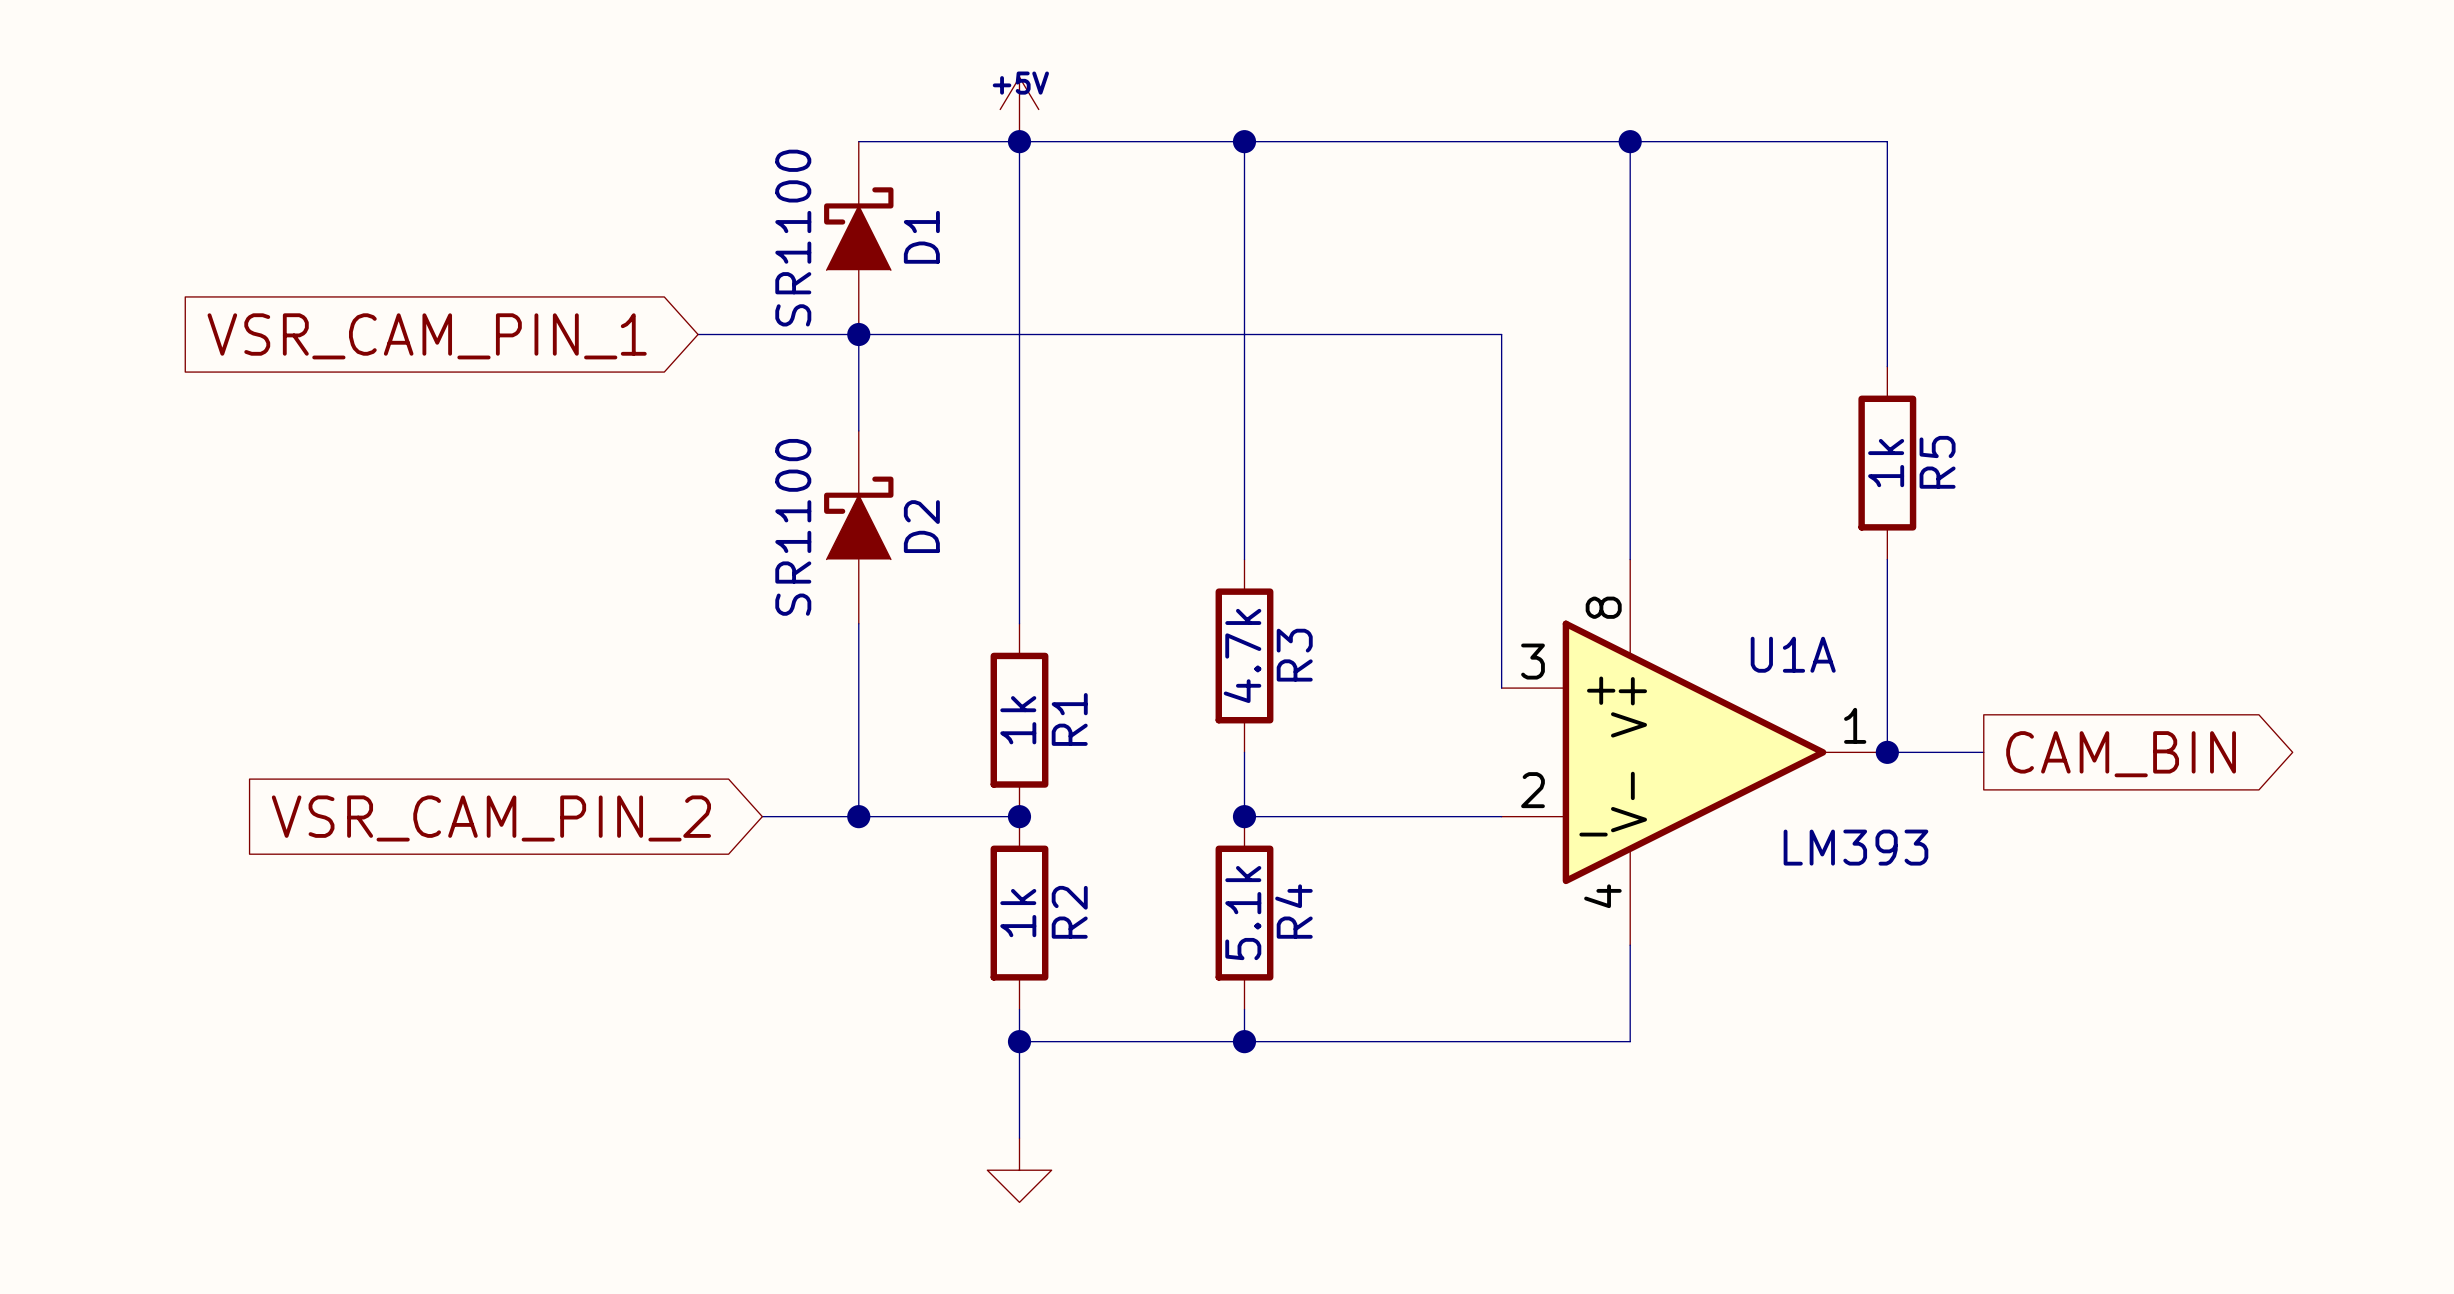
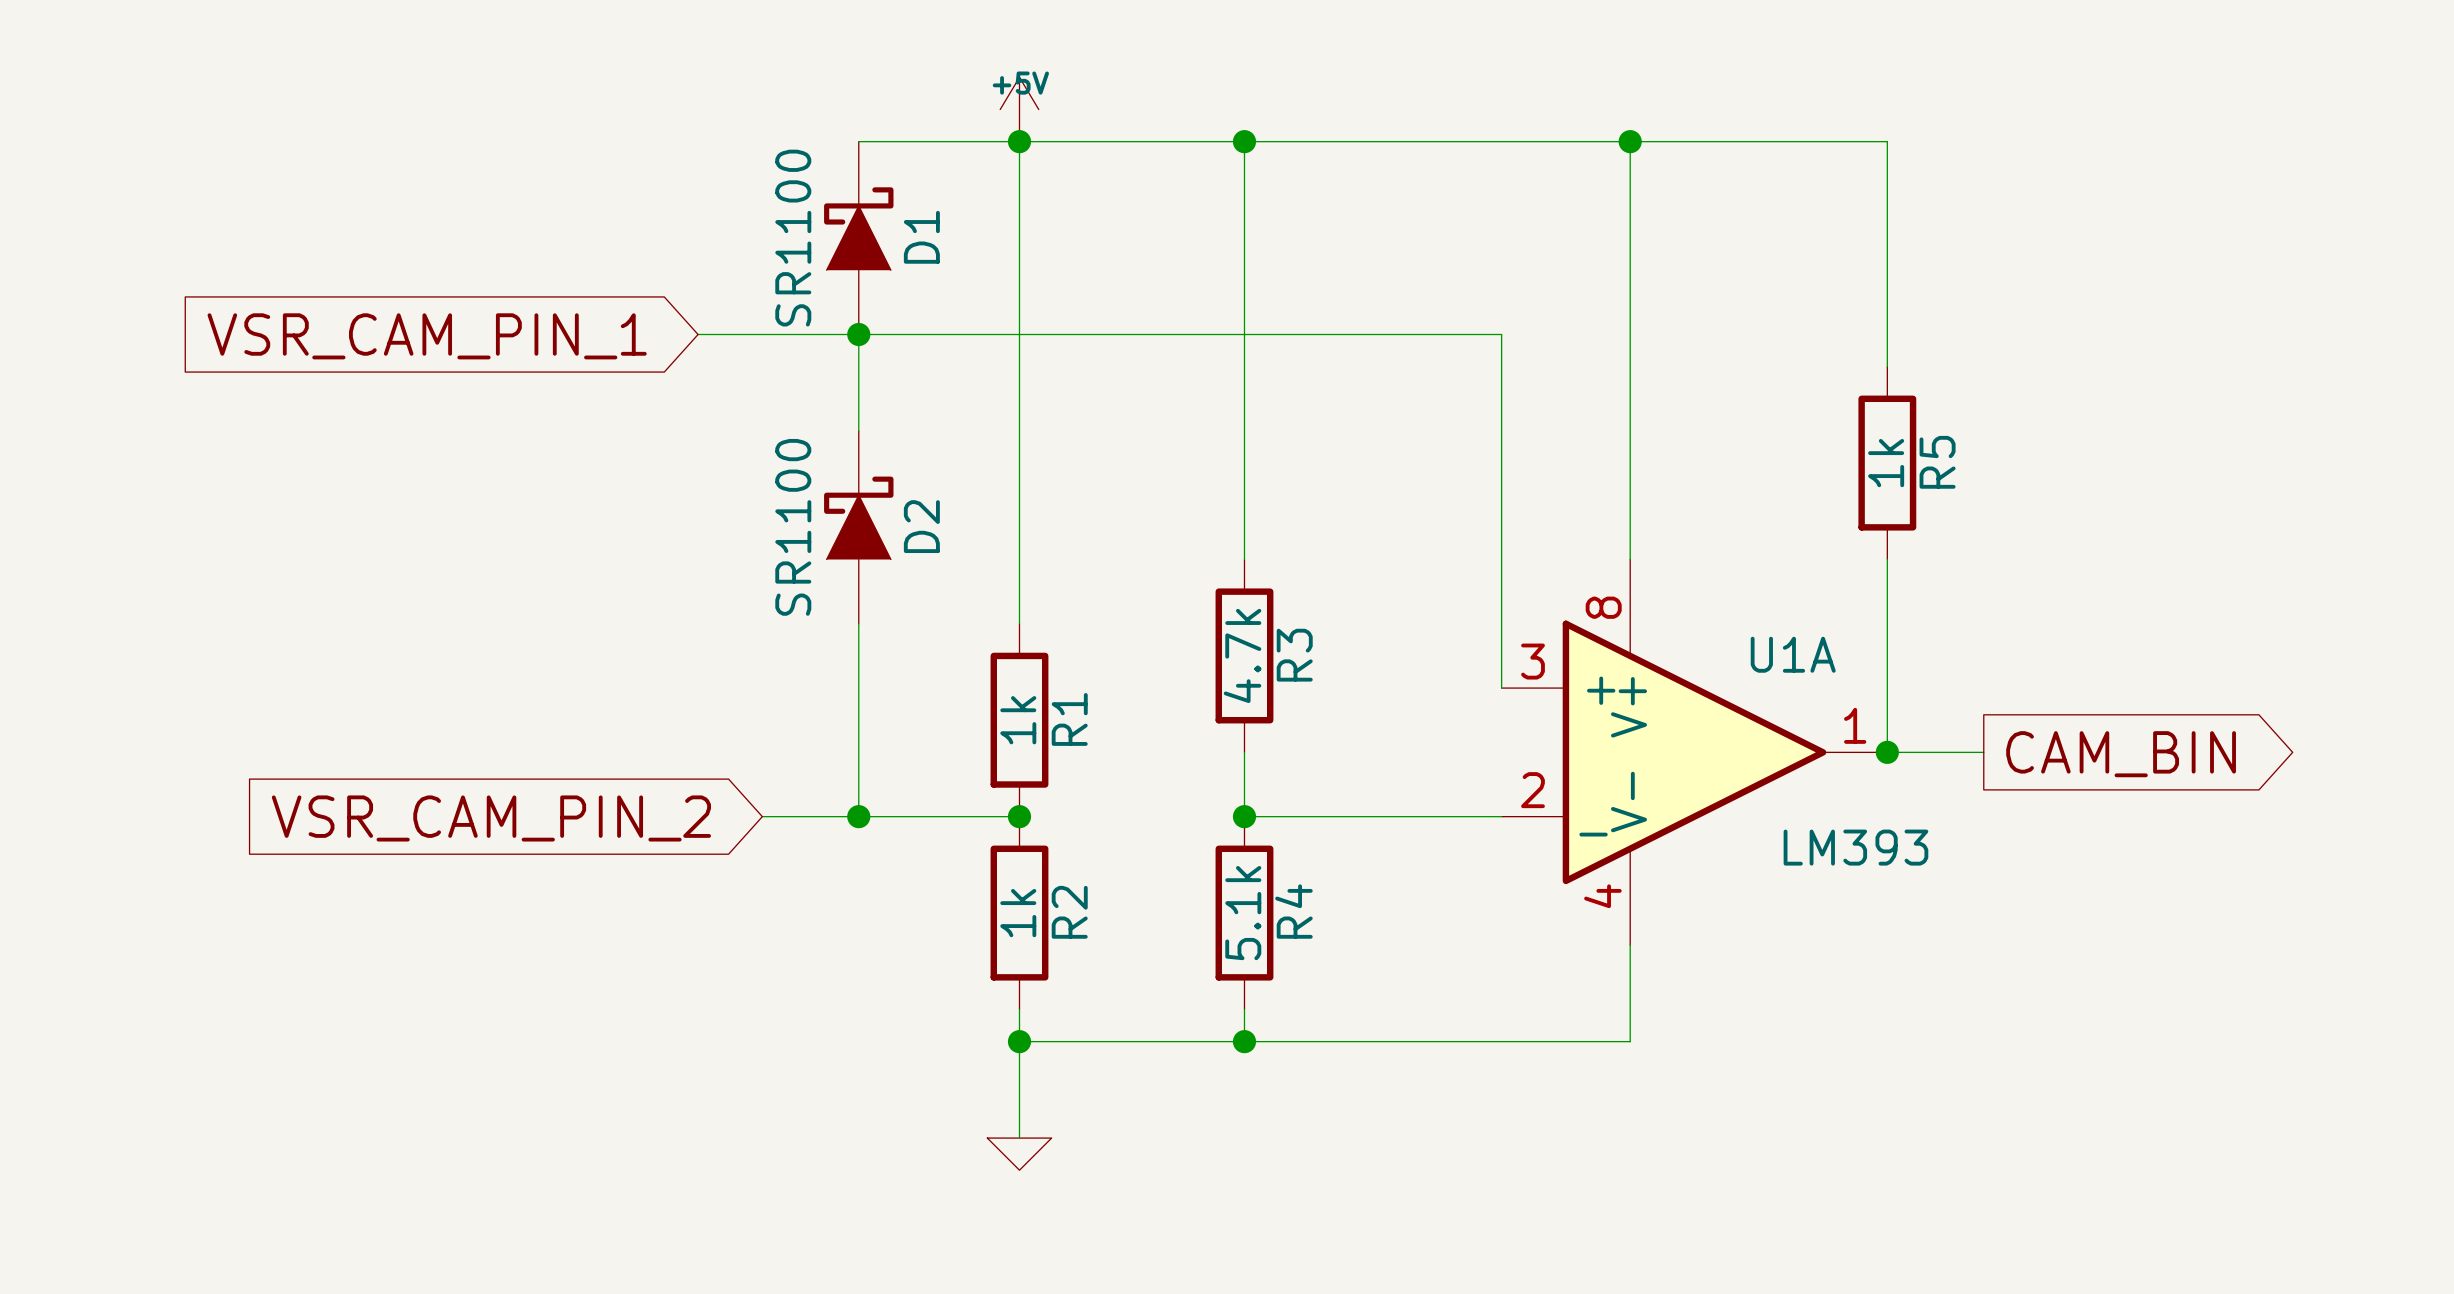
power symbol shape: [987, 1138, 1052, 1203] -> [987, 1138, 1052, 1171]

